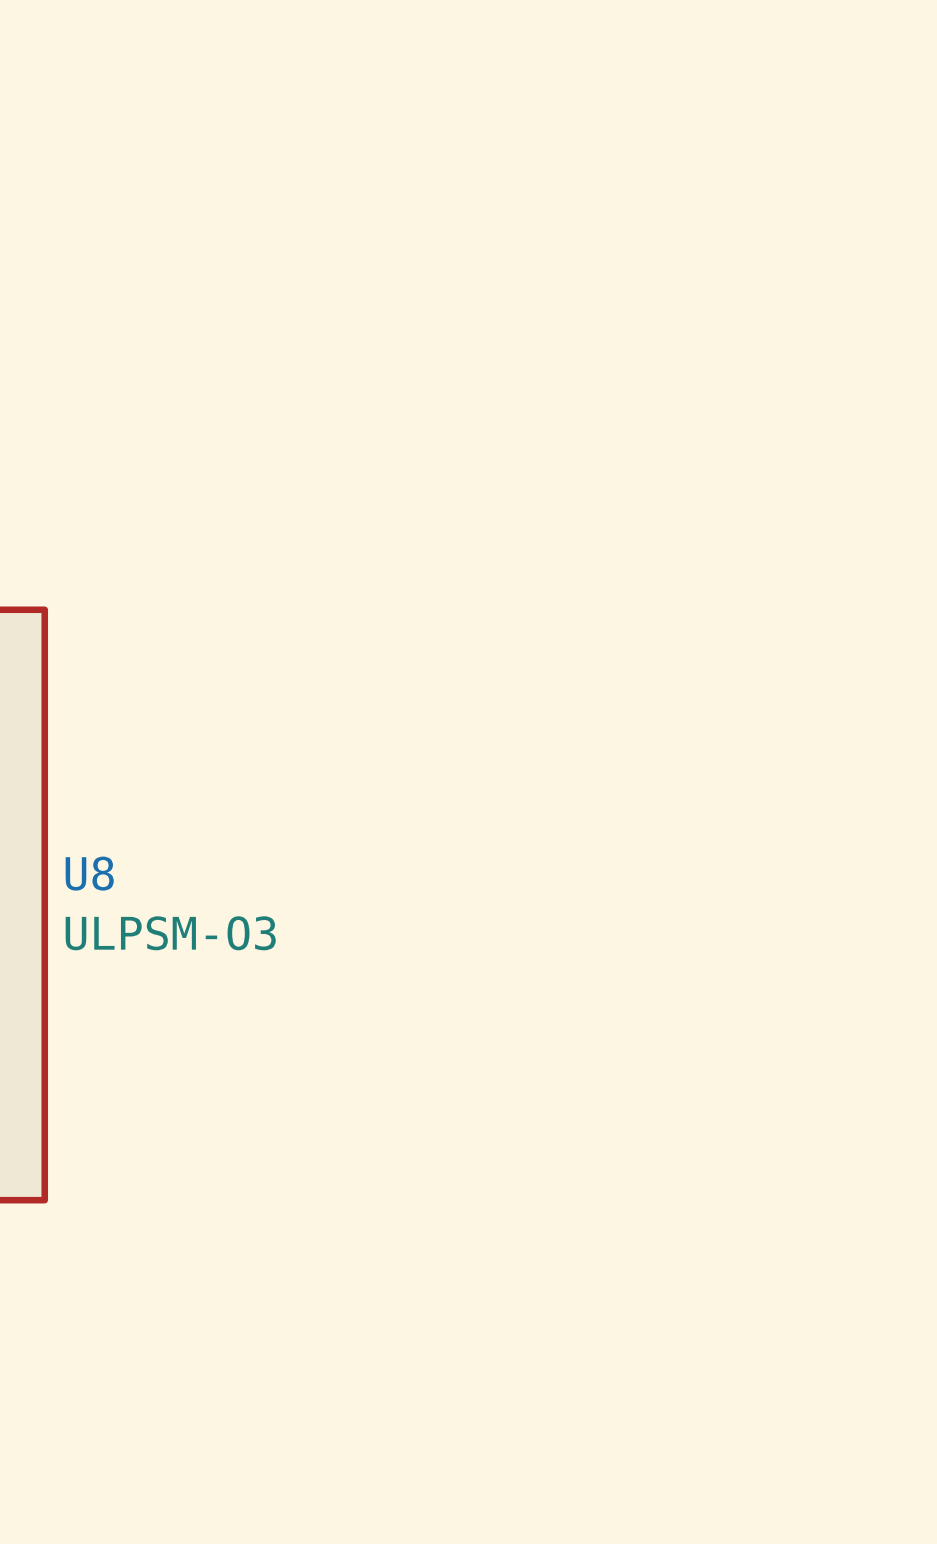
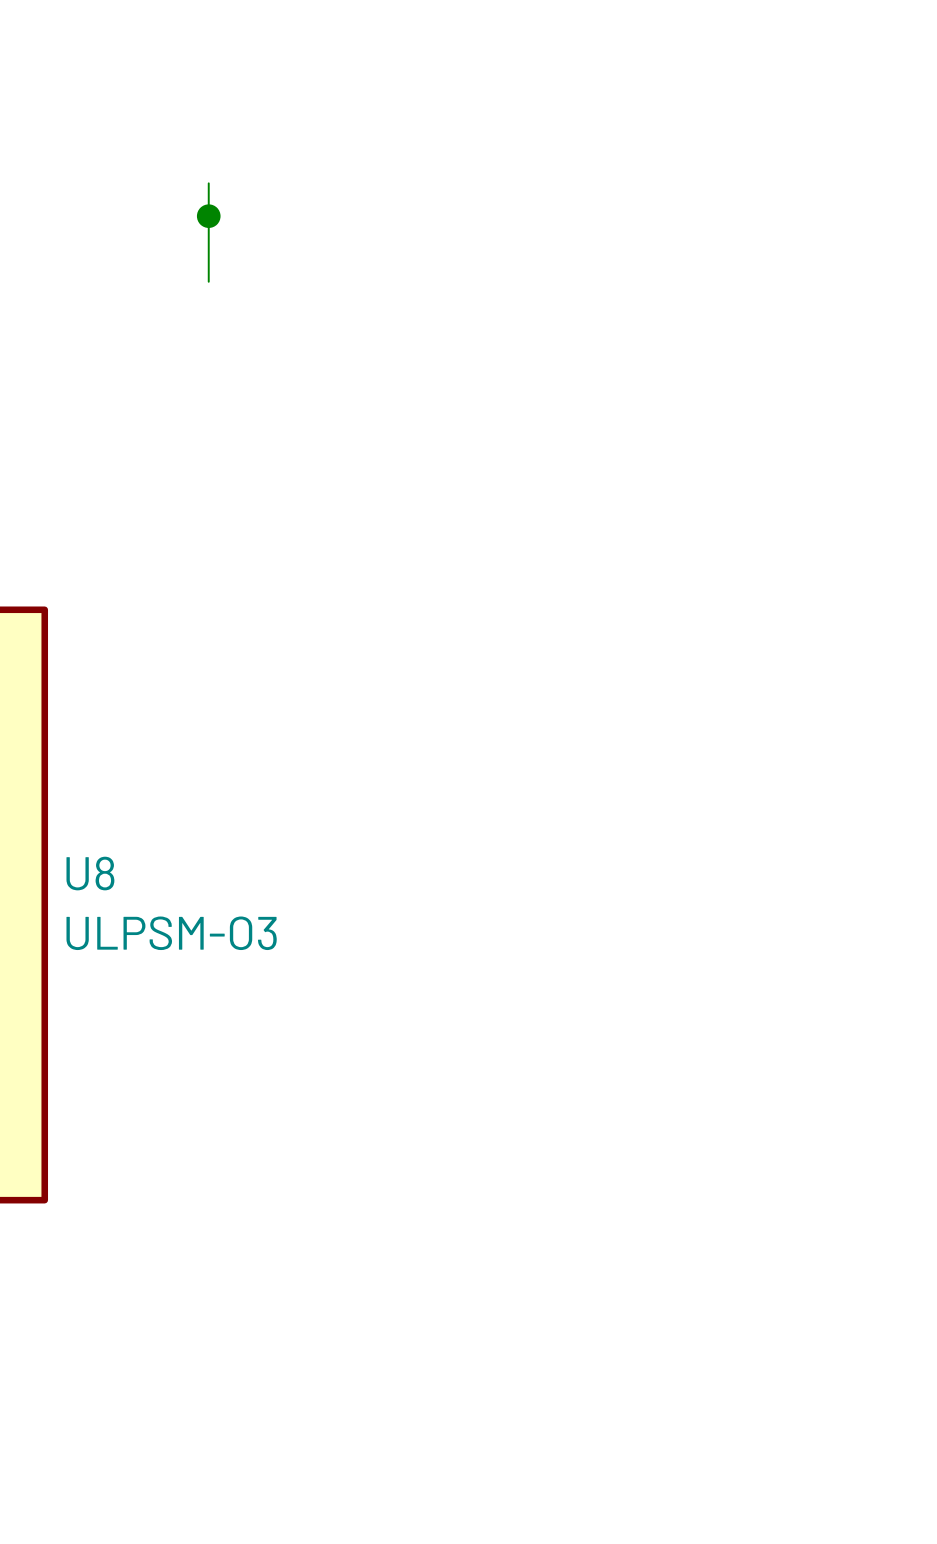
wire: none -> (208, 183) (208, 281)
junction: none -> (208, 216)

